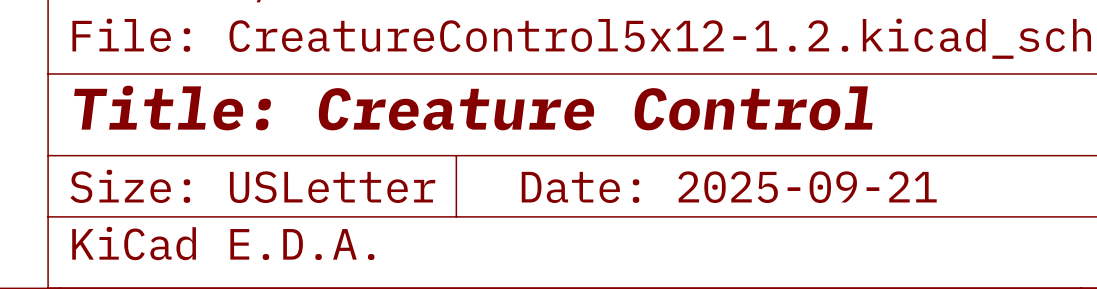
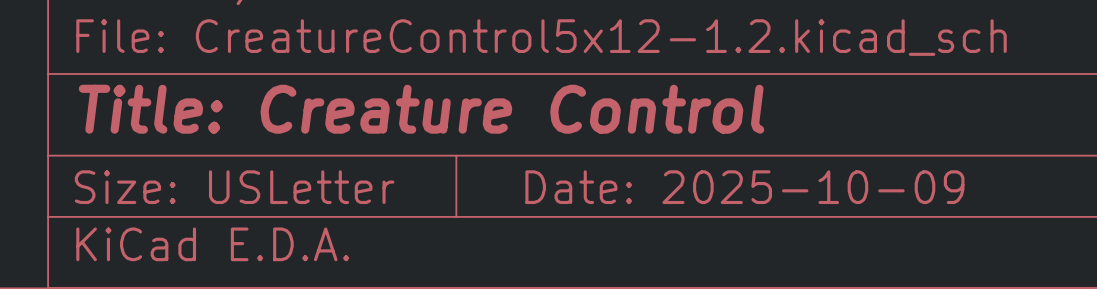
title block: Date: 2025-09-21 (729, 187) -> Date: 2025-10-09 (744, 187)

